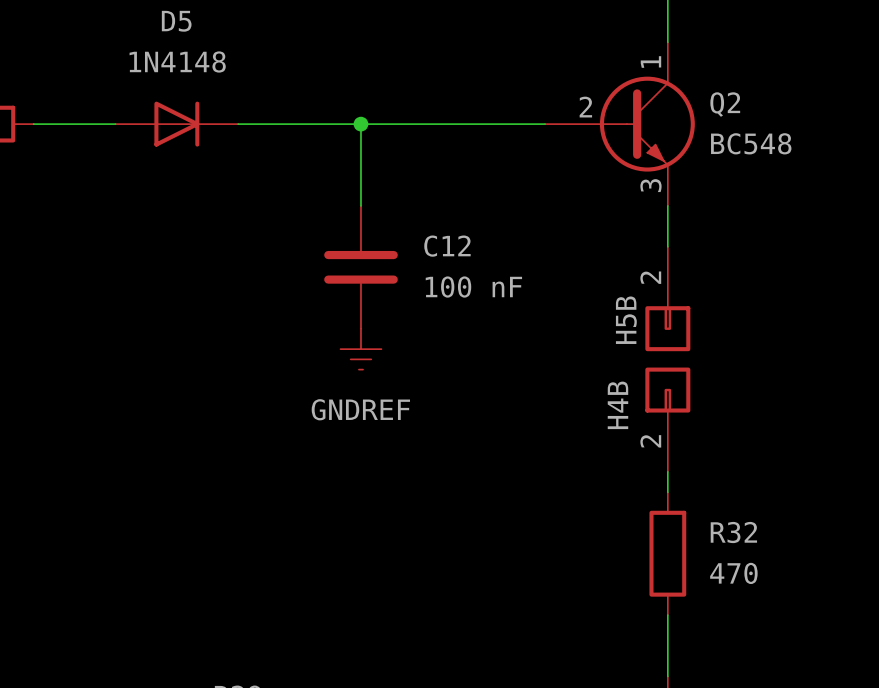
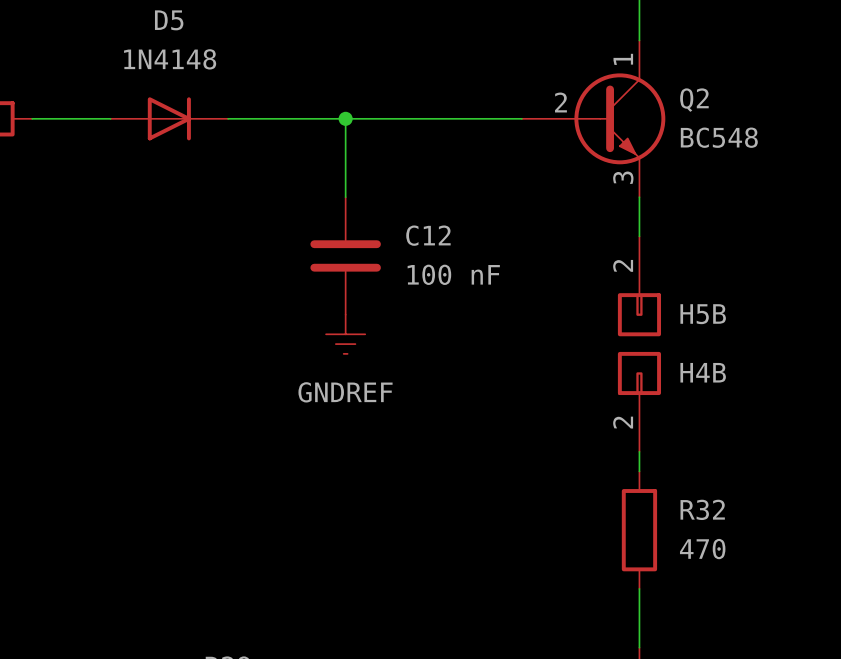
H5B name rotation: 0° (626, 320) -> 90° clockwise (703, 314)
H5B name position: H5B (626, 320) -> H5B (703, 314)
H4B name rotation: 0° (617, 405) -> 90° clockwise (703, 372)
H4B name position: H4B (617, 405) -> H4B (703, 372)

